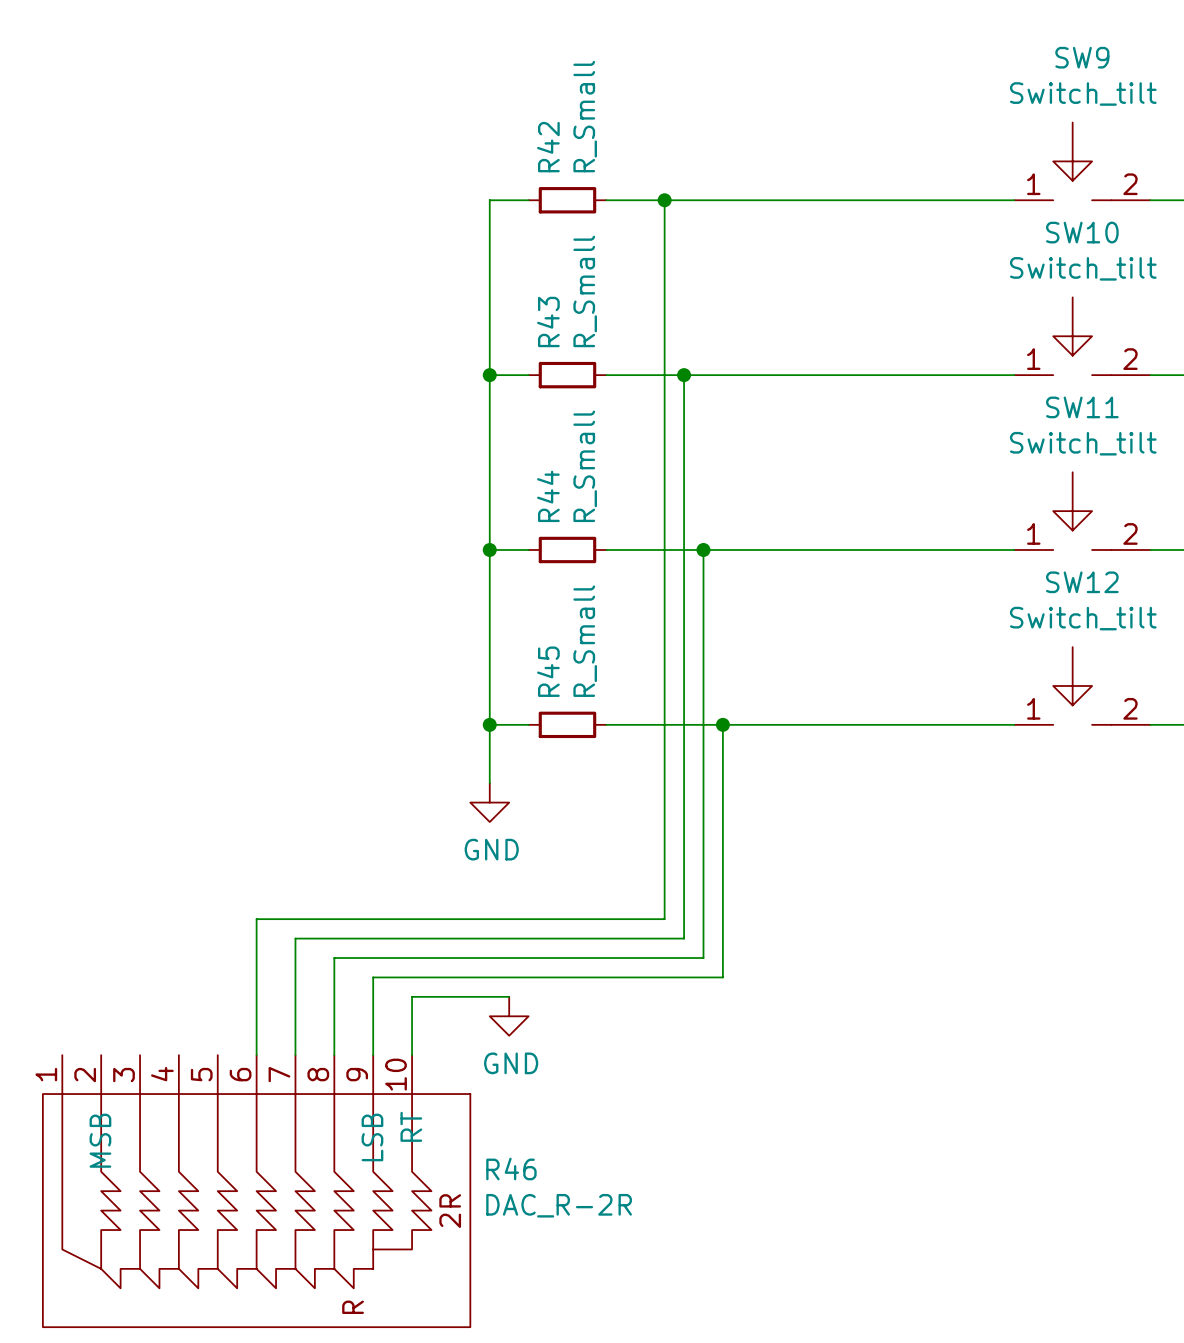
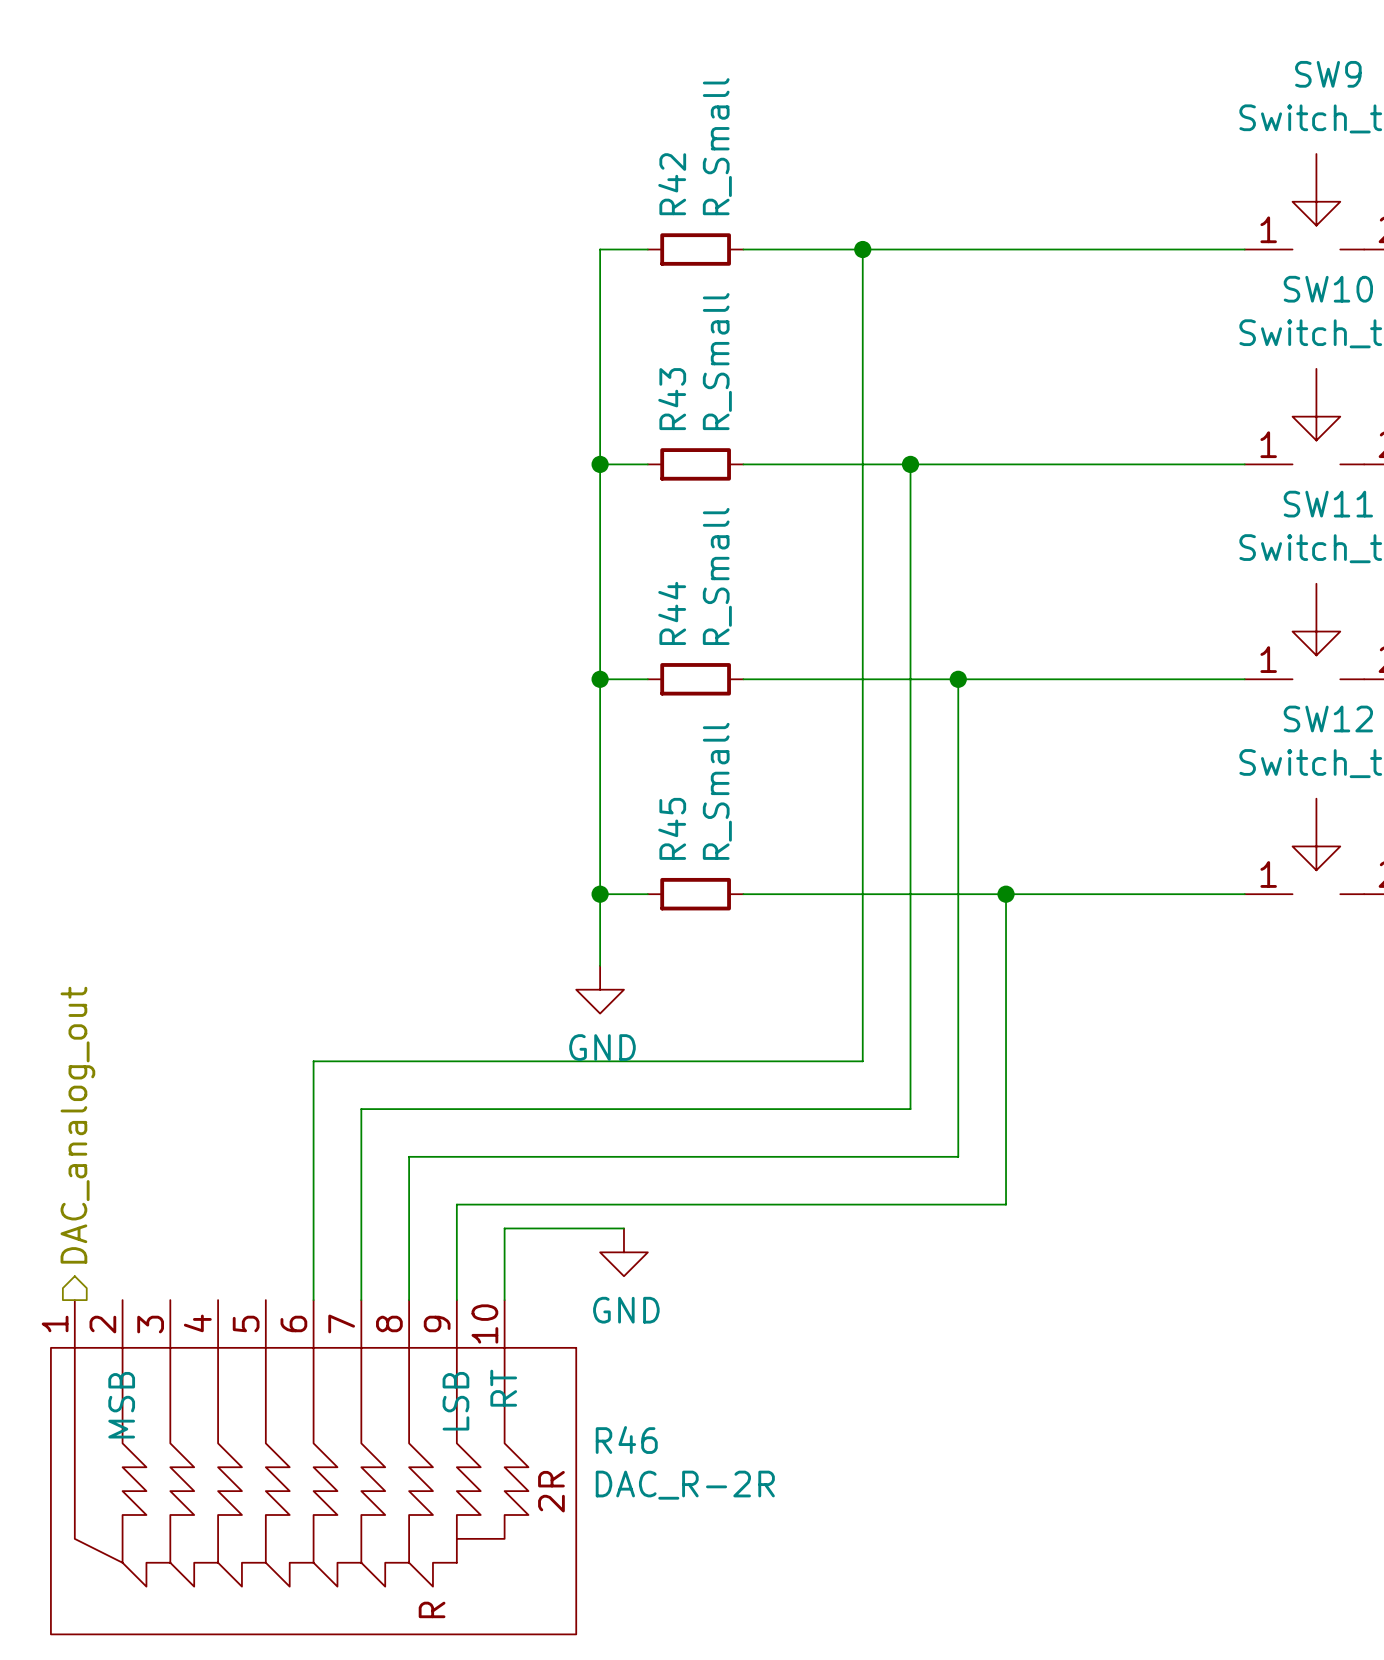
wire: (664, 200) (664, 919) (256, 919) -> none
junction position: (664, 200) -> (862, 249)
wire: none -> (862, 249) (862, 679)
wire: (684, 375) (684, 938) -> (958, 679) (958, 1156) (838, 1156)
junction position: (684, 375) -> (910, 464)
wire: none -> (910, 464) (910, 1109) (361, 1109) (361, 1156)
junction position: (703, 549) -> (958, 679)
wire: (722, 724) (722, 977) -> (1006, 894) (1006, 1204) (886, 1204)
junction: (722, 724) -> none
junction: none -> (1006, 894)
wire: (703, 860) (703, 958) (334, 958) -> (862, 1061) (313, 1061) (313, 1132)
hierarchical label: none -> DAC_analog_out (77, 1125)
wire: (295, 938) (334, 938) -> (409, 1180) (409, 1156)

